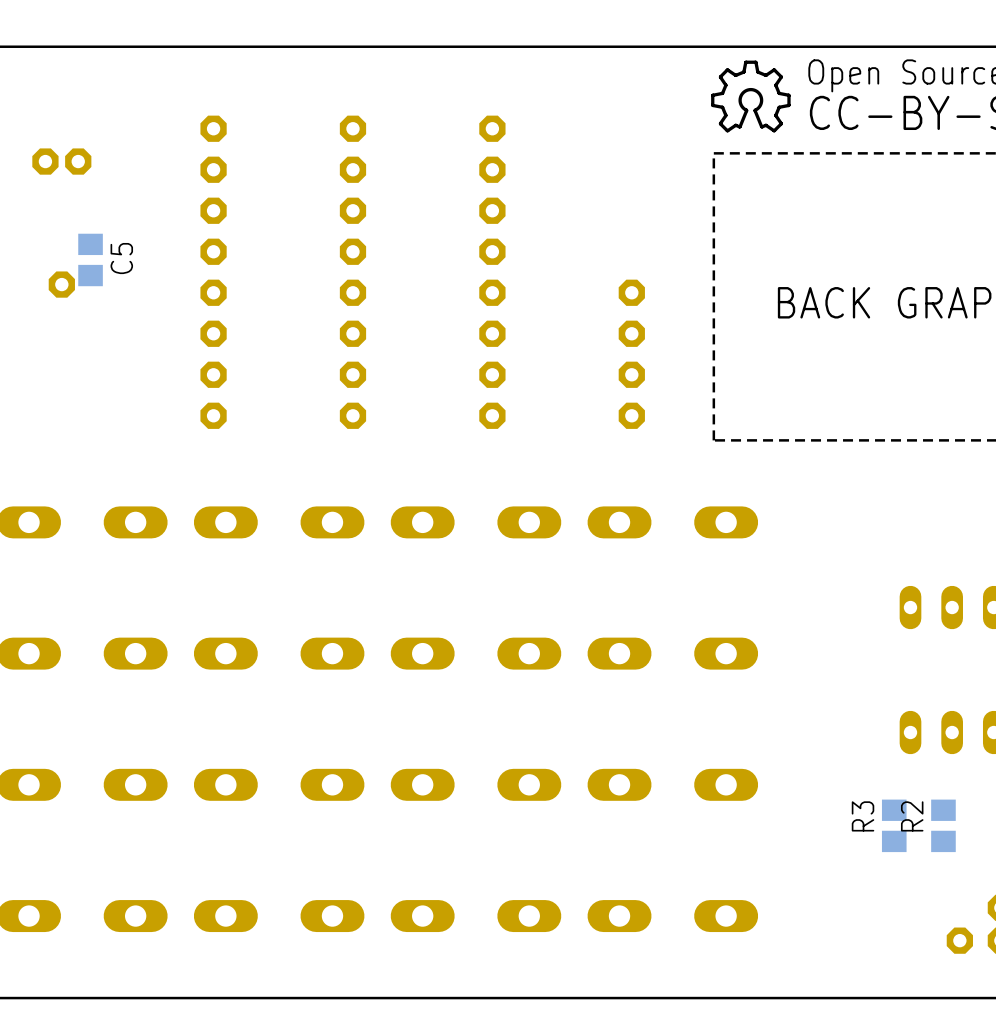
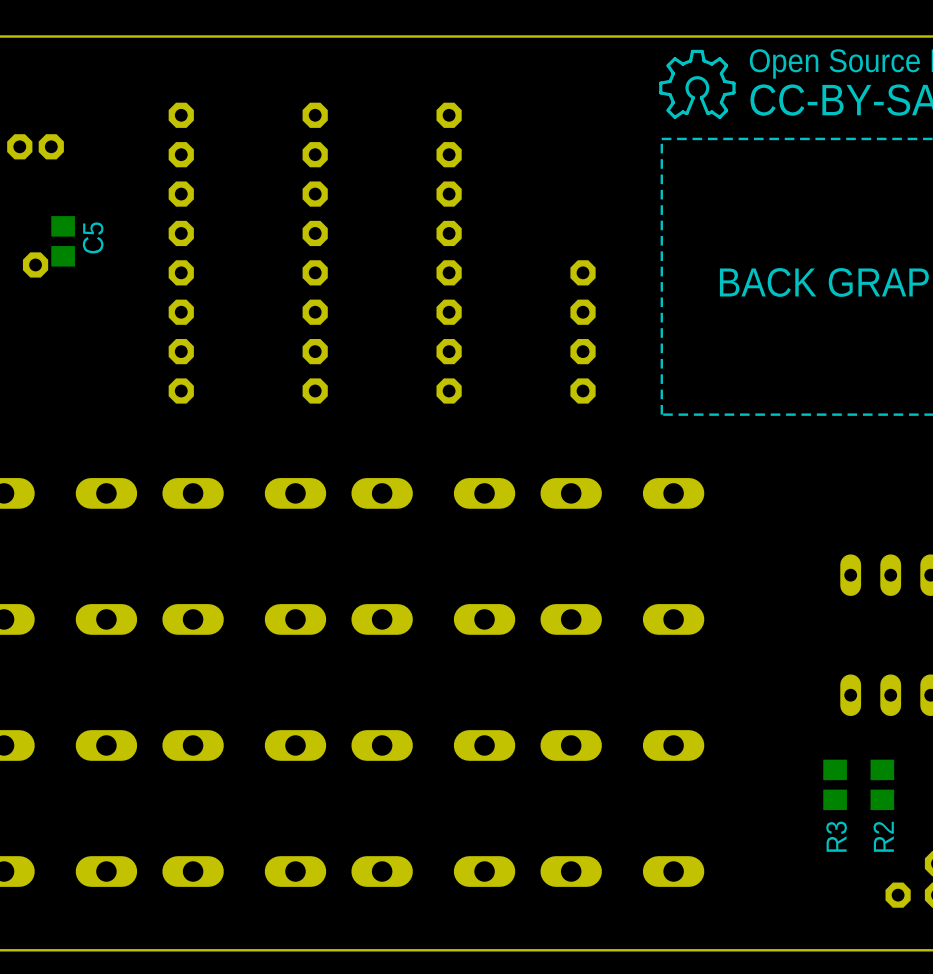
R3 name position: R3 (863, 816) -> R3 (836, 836)
R2 name position: R2 (912, 816) -> R2 (883, 836)

